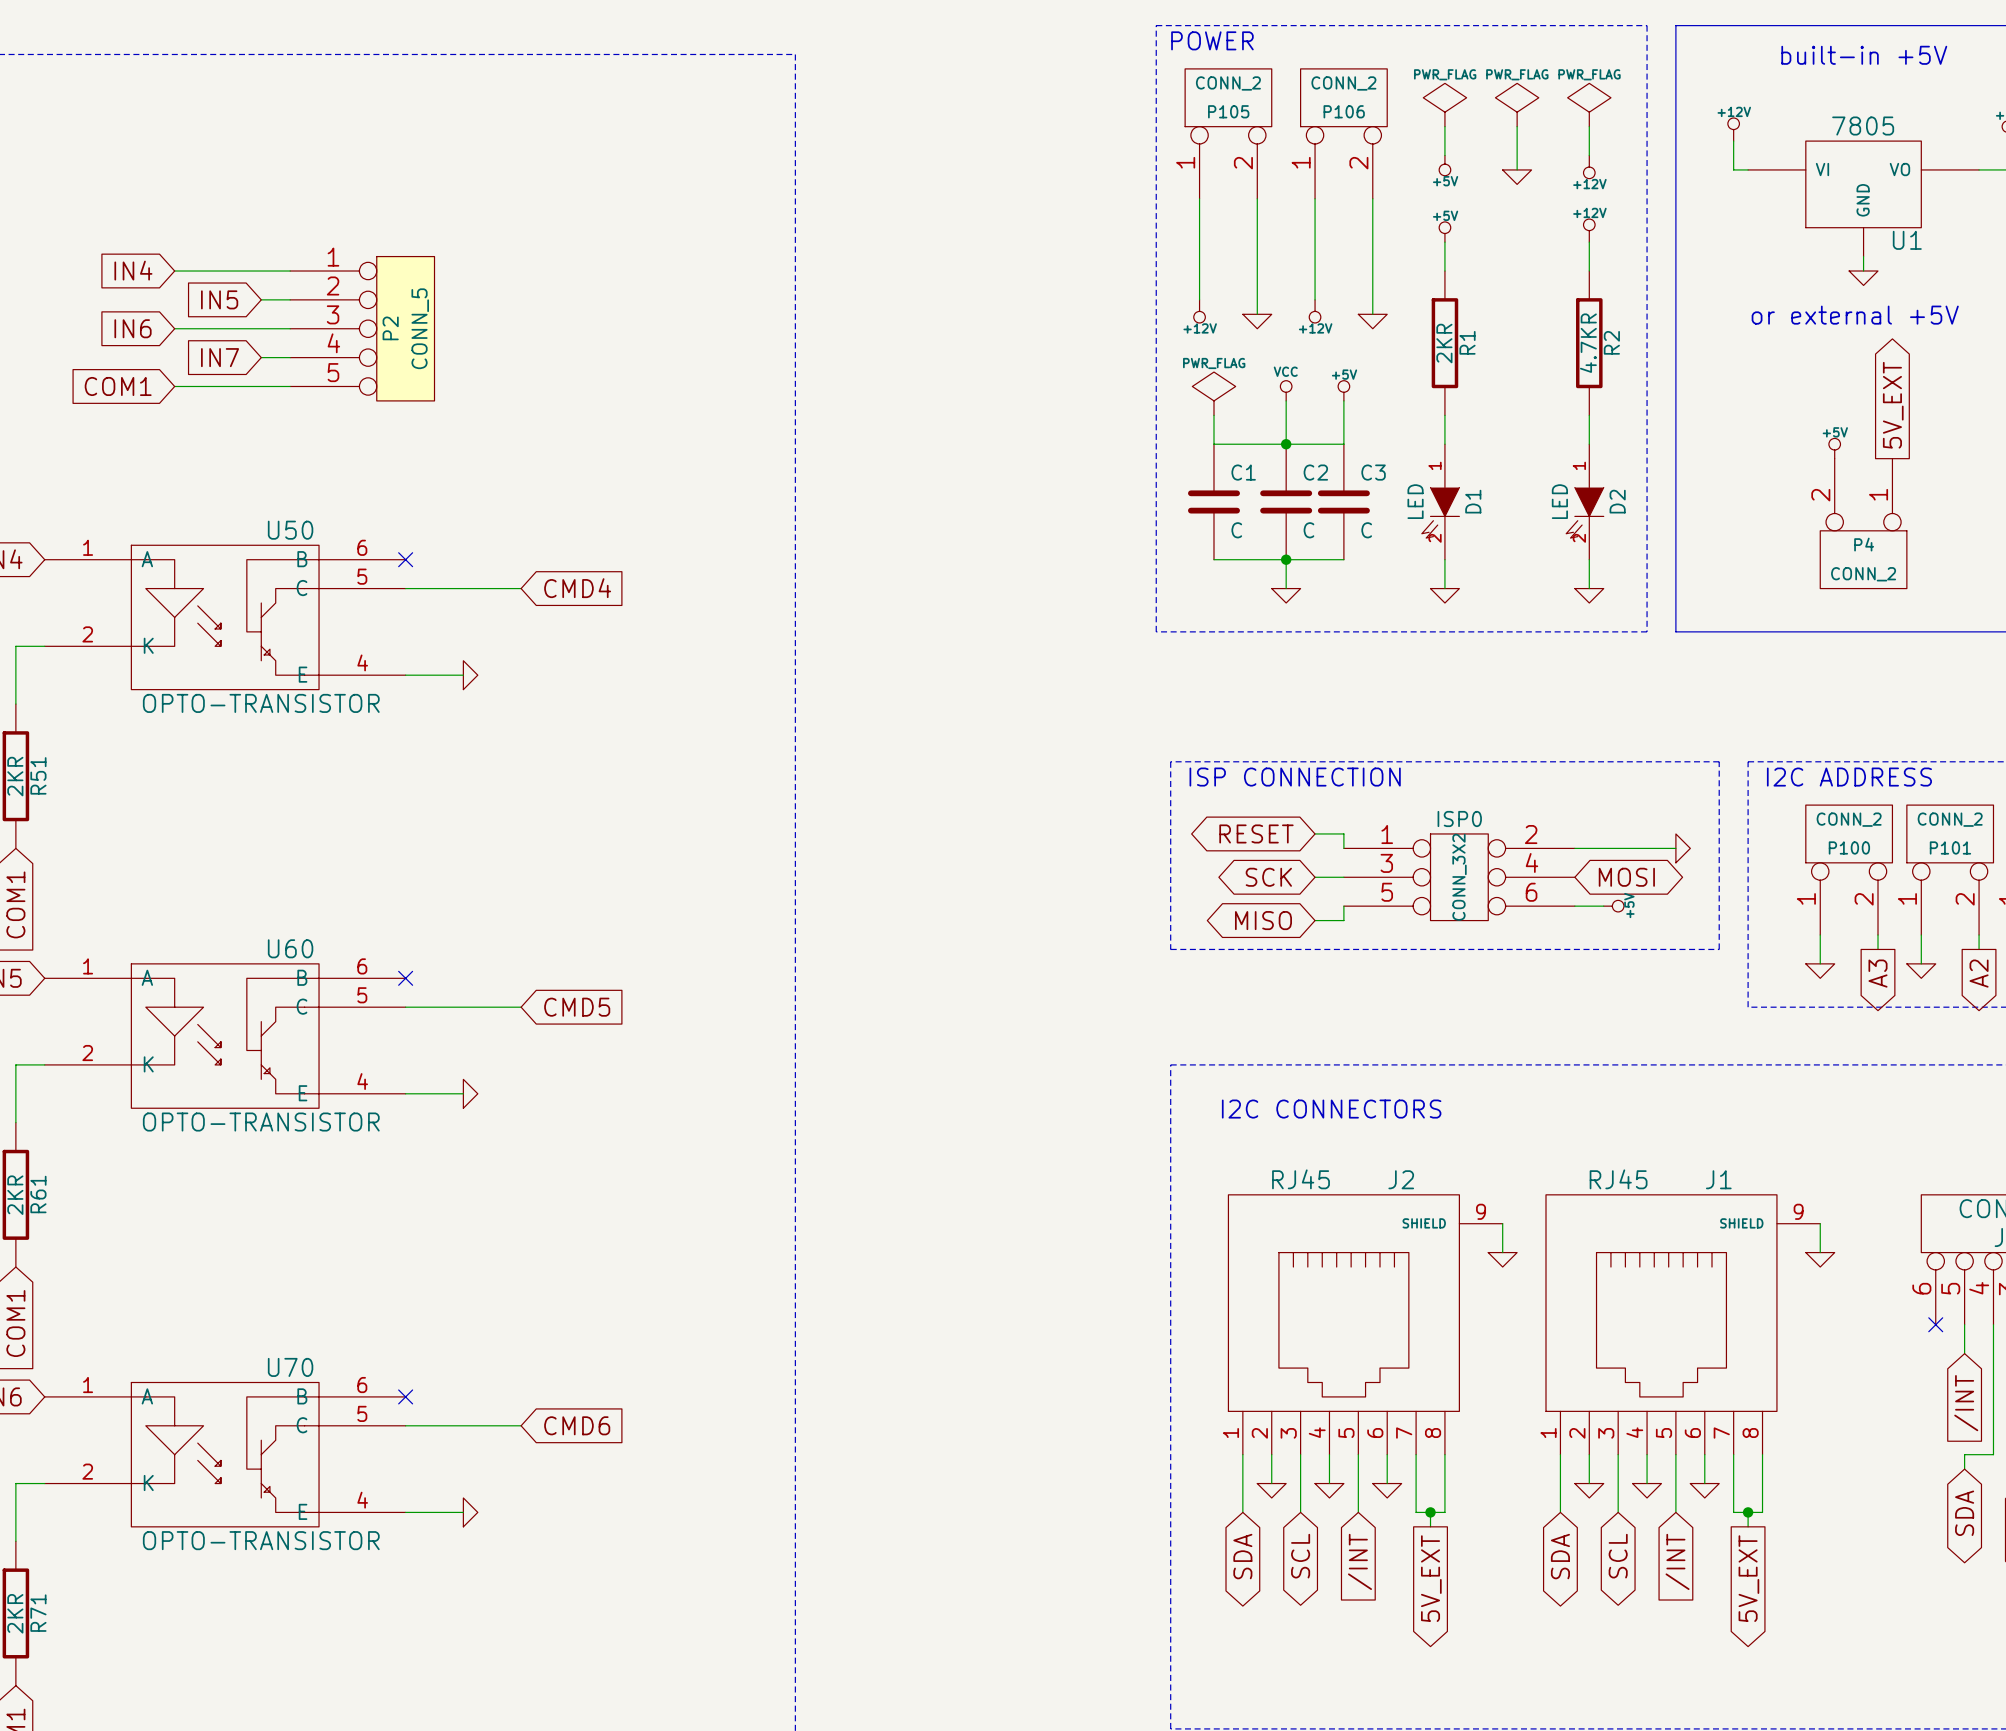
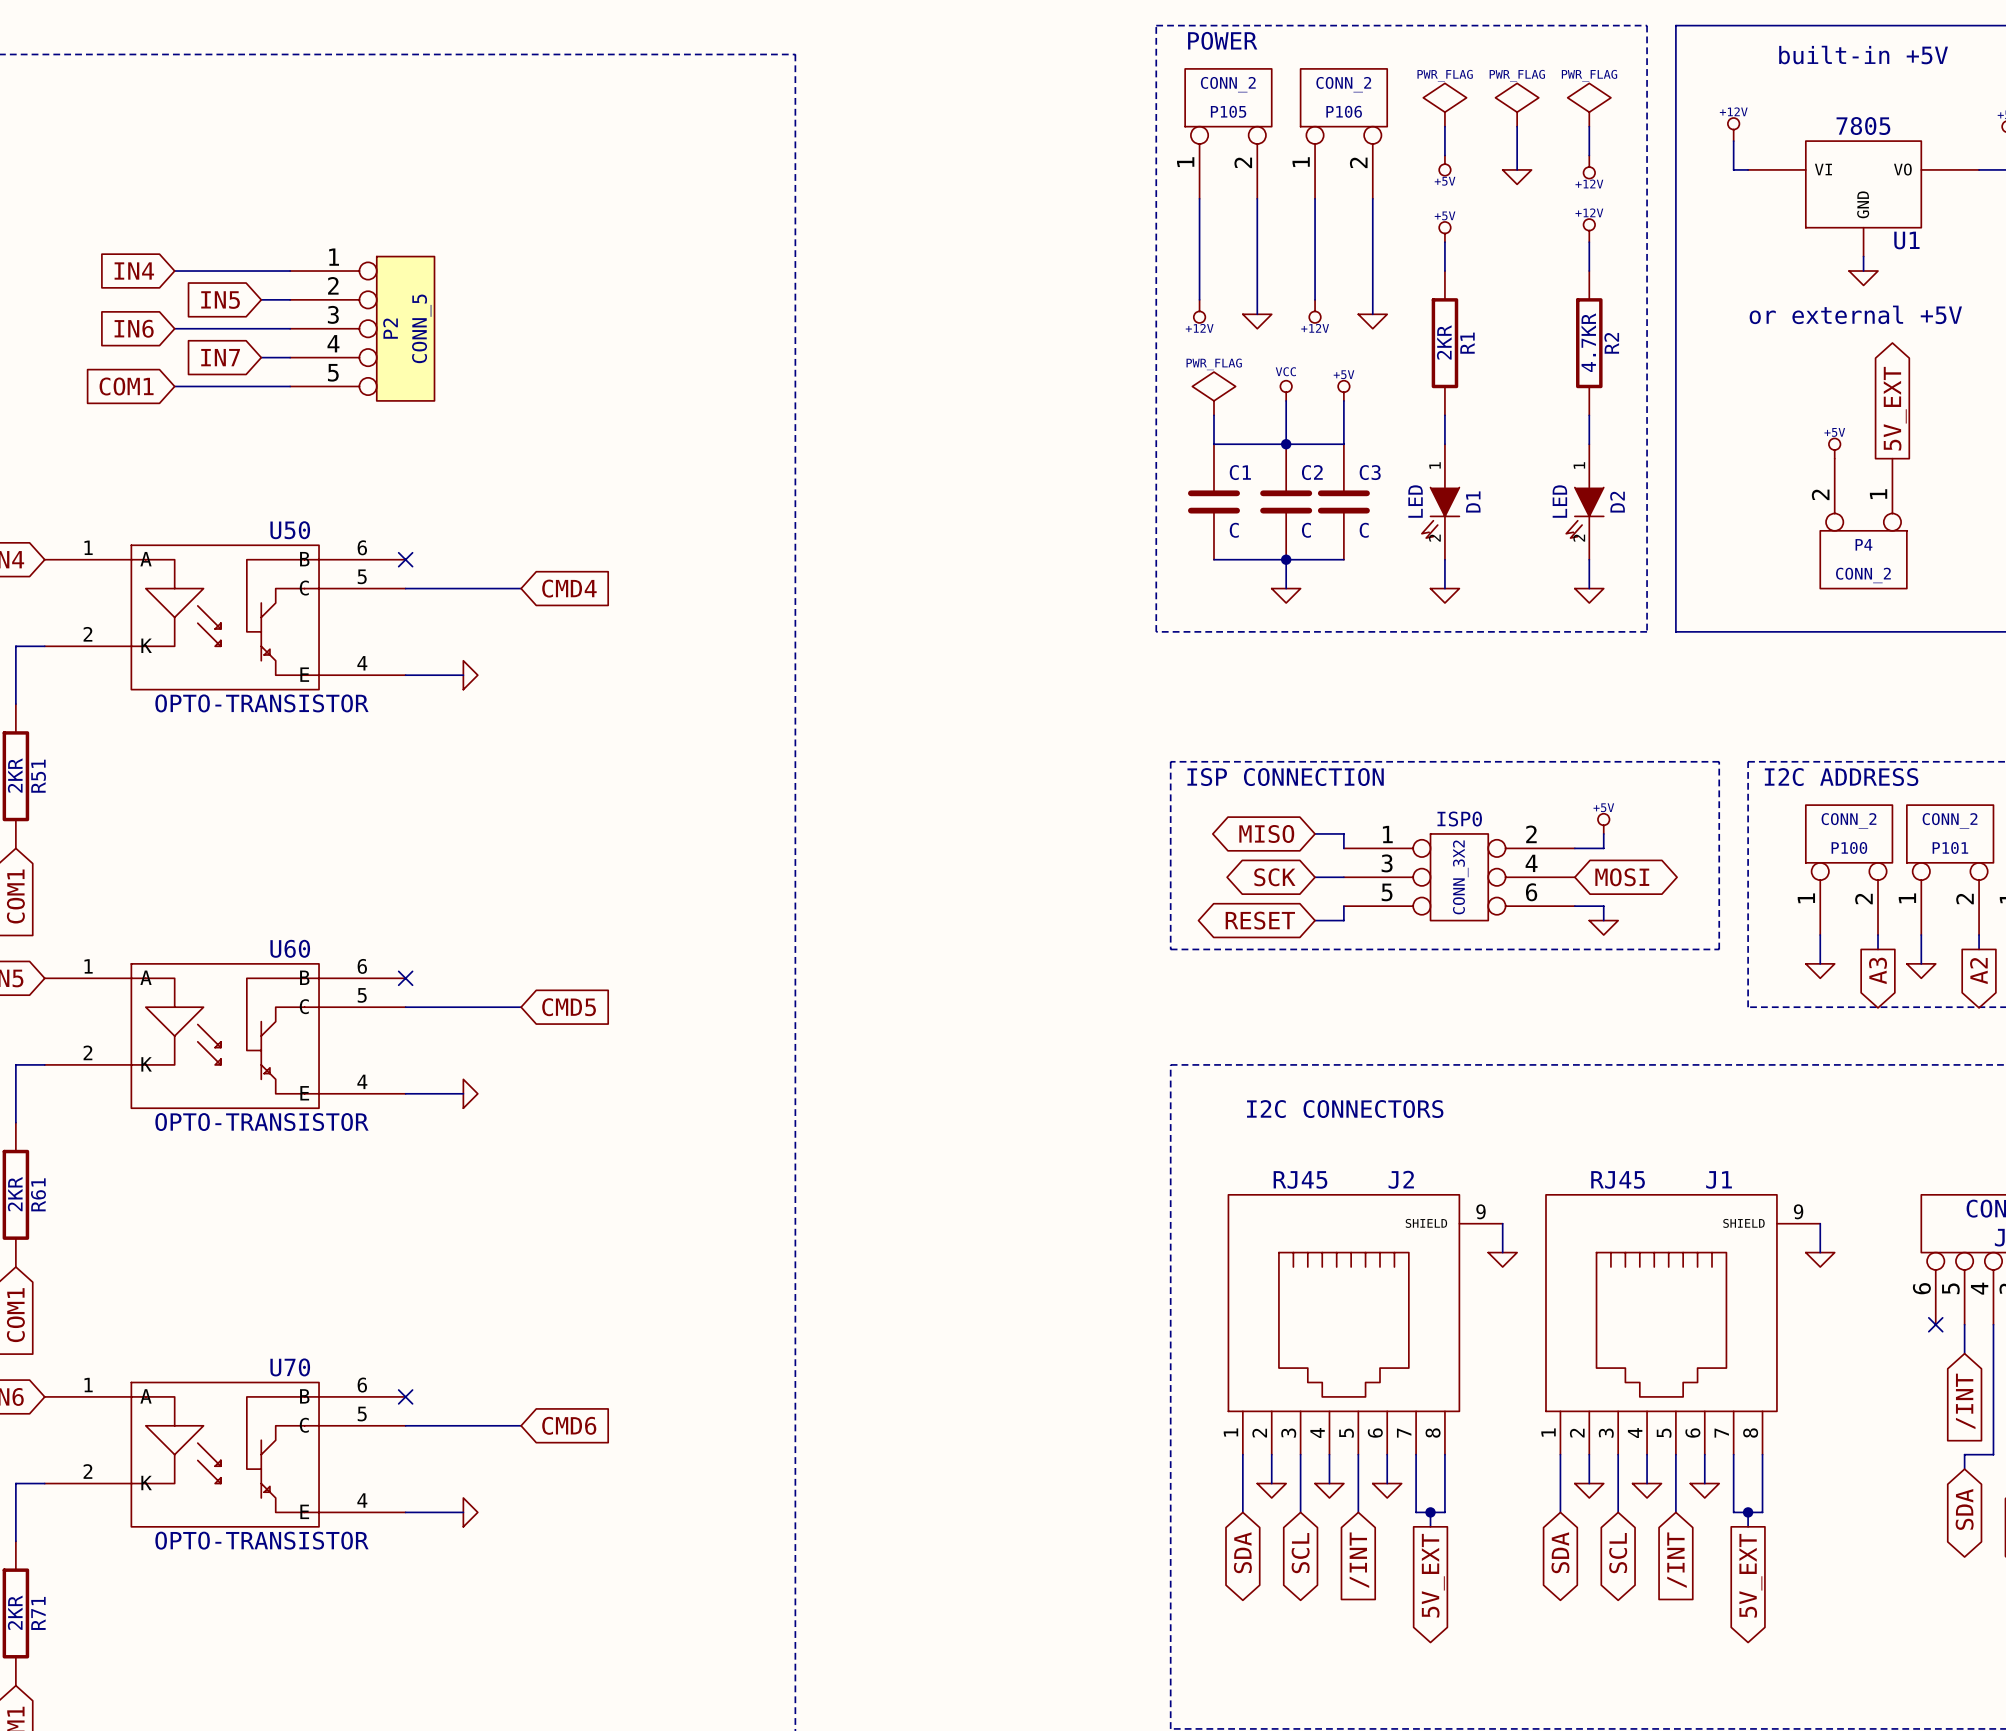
global label: RESET (1256, 833) -> MISO (1266, 833)
wire: (1603, 848) (1675, 848) -> (1603, 848) (1603, 833)
power symbol rotation: 0° (1683, 848) -> 90° clockwise (1603, 927)
power symbol position: (1683, 848) -> (1603, 927)
wire: none -> (1603, 906) (1603, 920)
power symbol rotation: 0° (1613, 906) -> 90° counterclockwise (1603, 823)
power symbol position: +5V (1613, 906) -> +5V (1603, 823)
global label: MISO (1263, 920) -> RESET (1260, 920)

